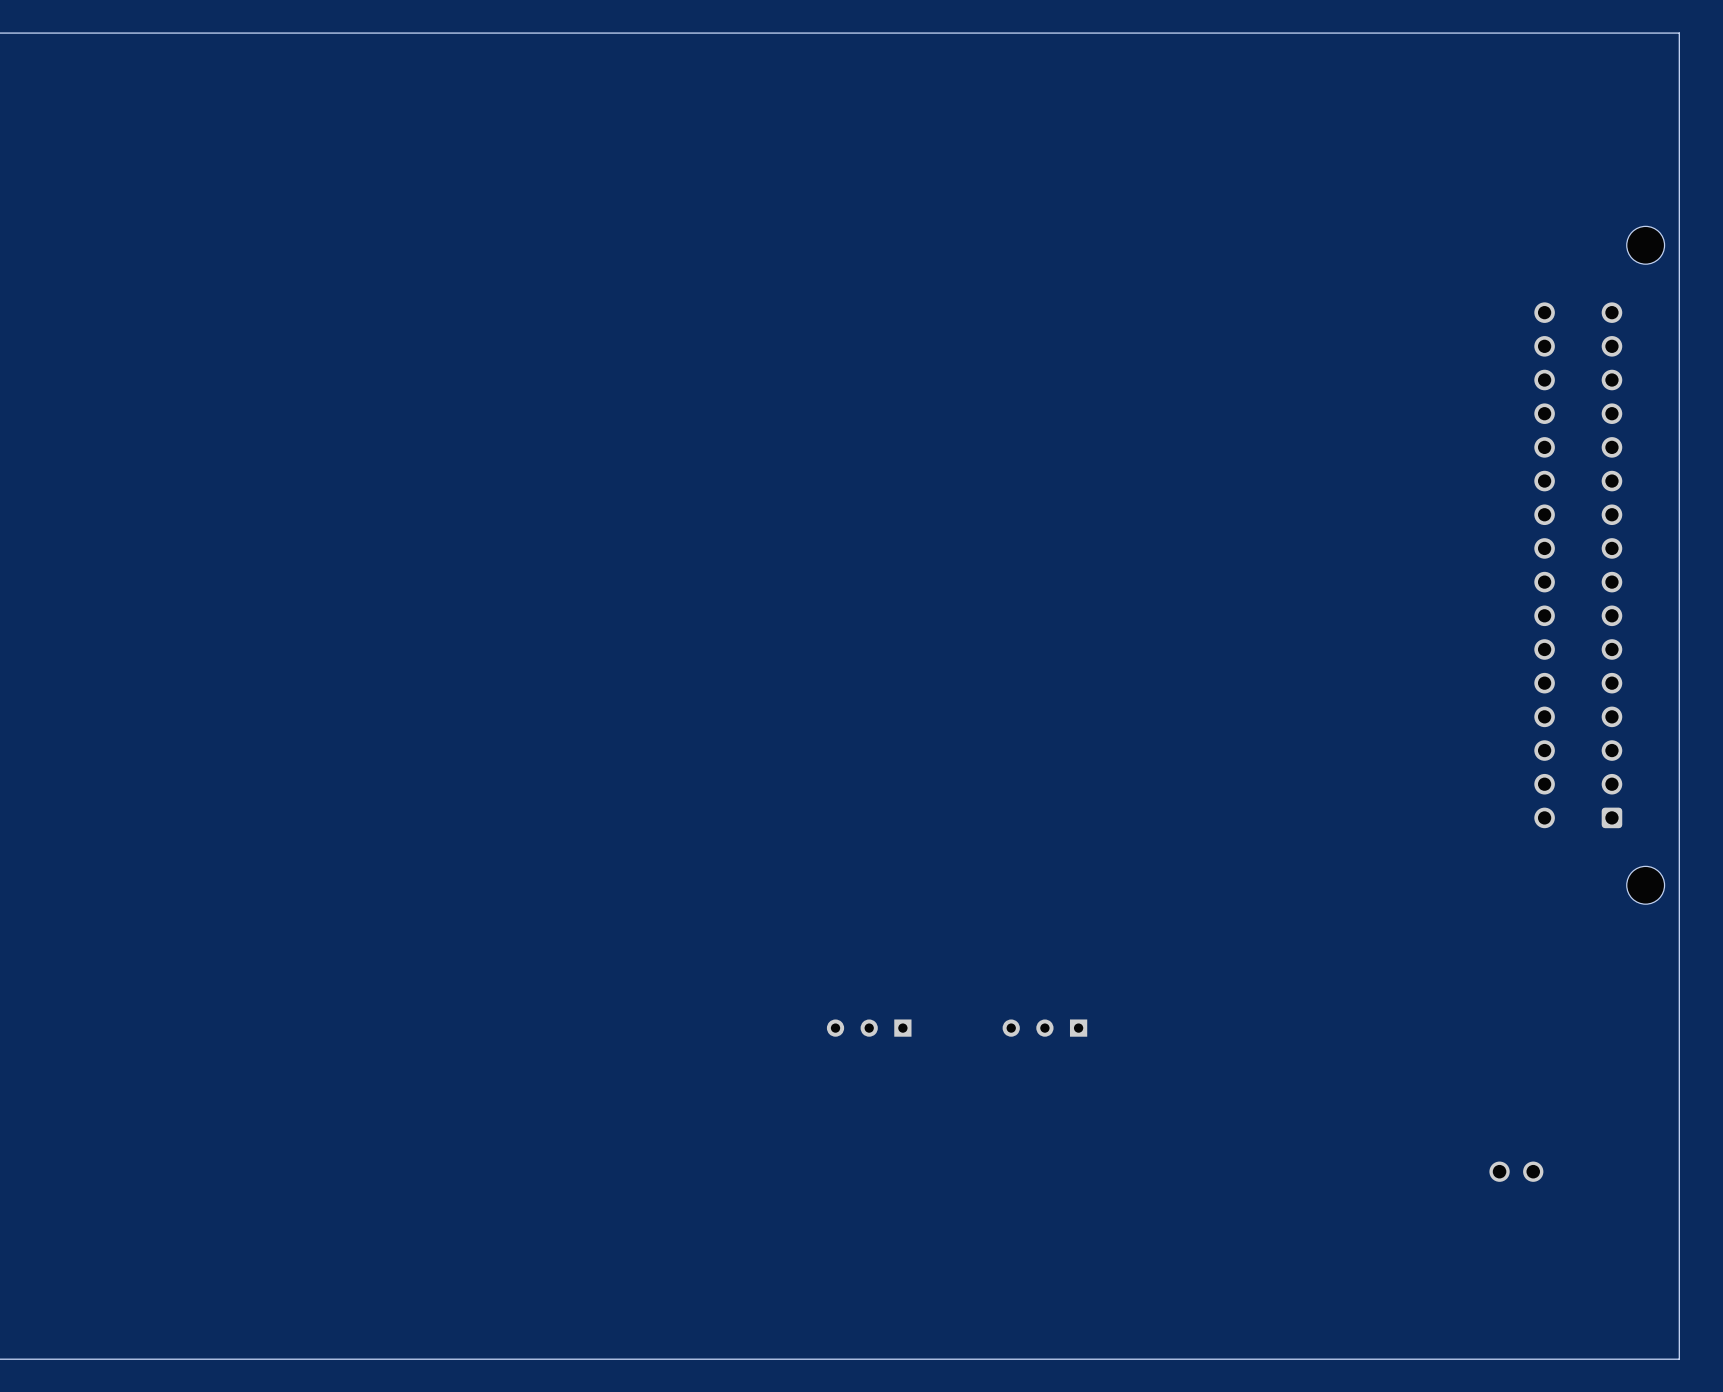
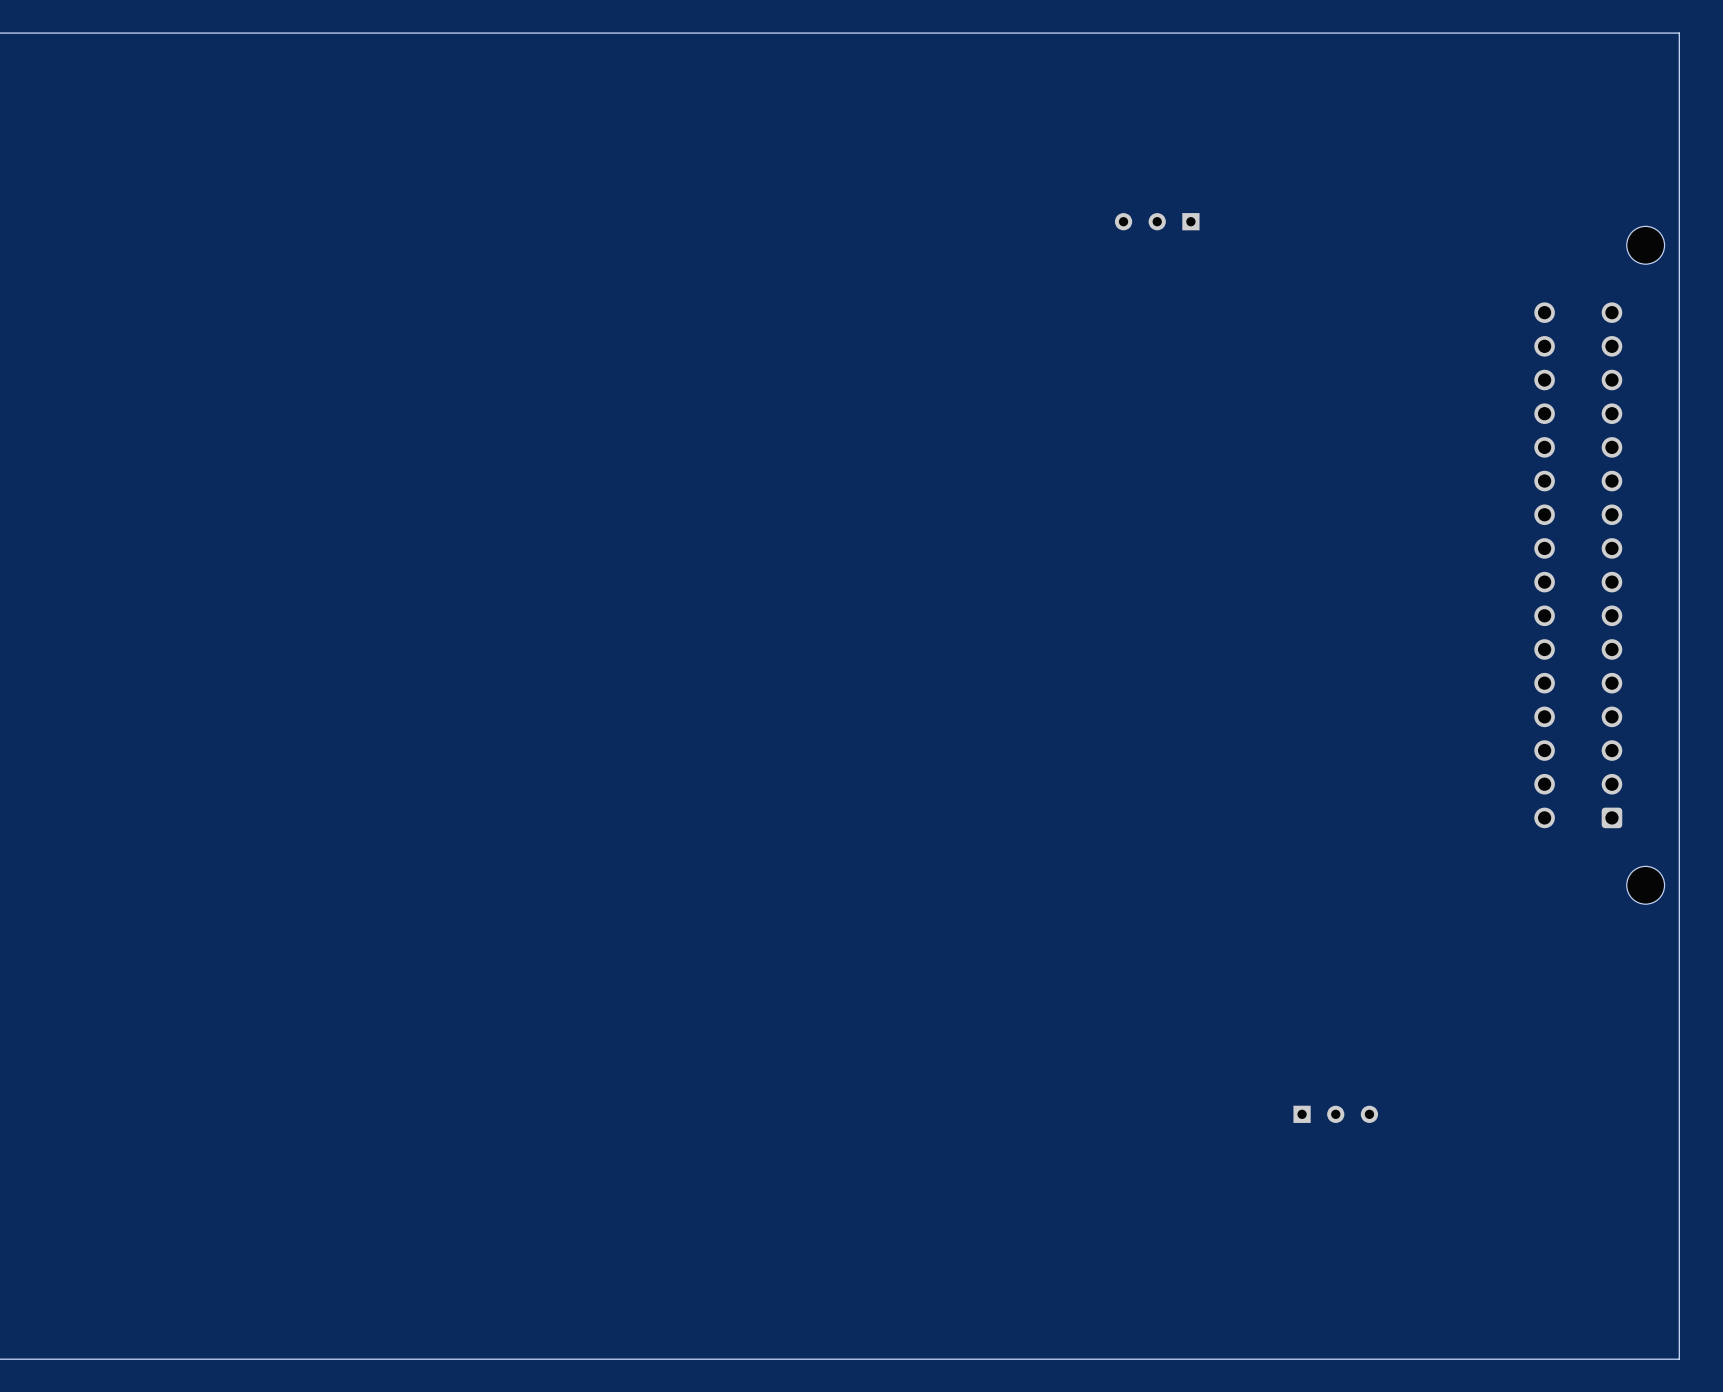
part: none -> (1157, 221)
part: (869, 1028) -> none
part: (1044, 1028) -> none
part: none -> (1335, 1114)
part: (1516, 1171) -> none

